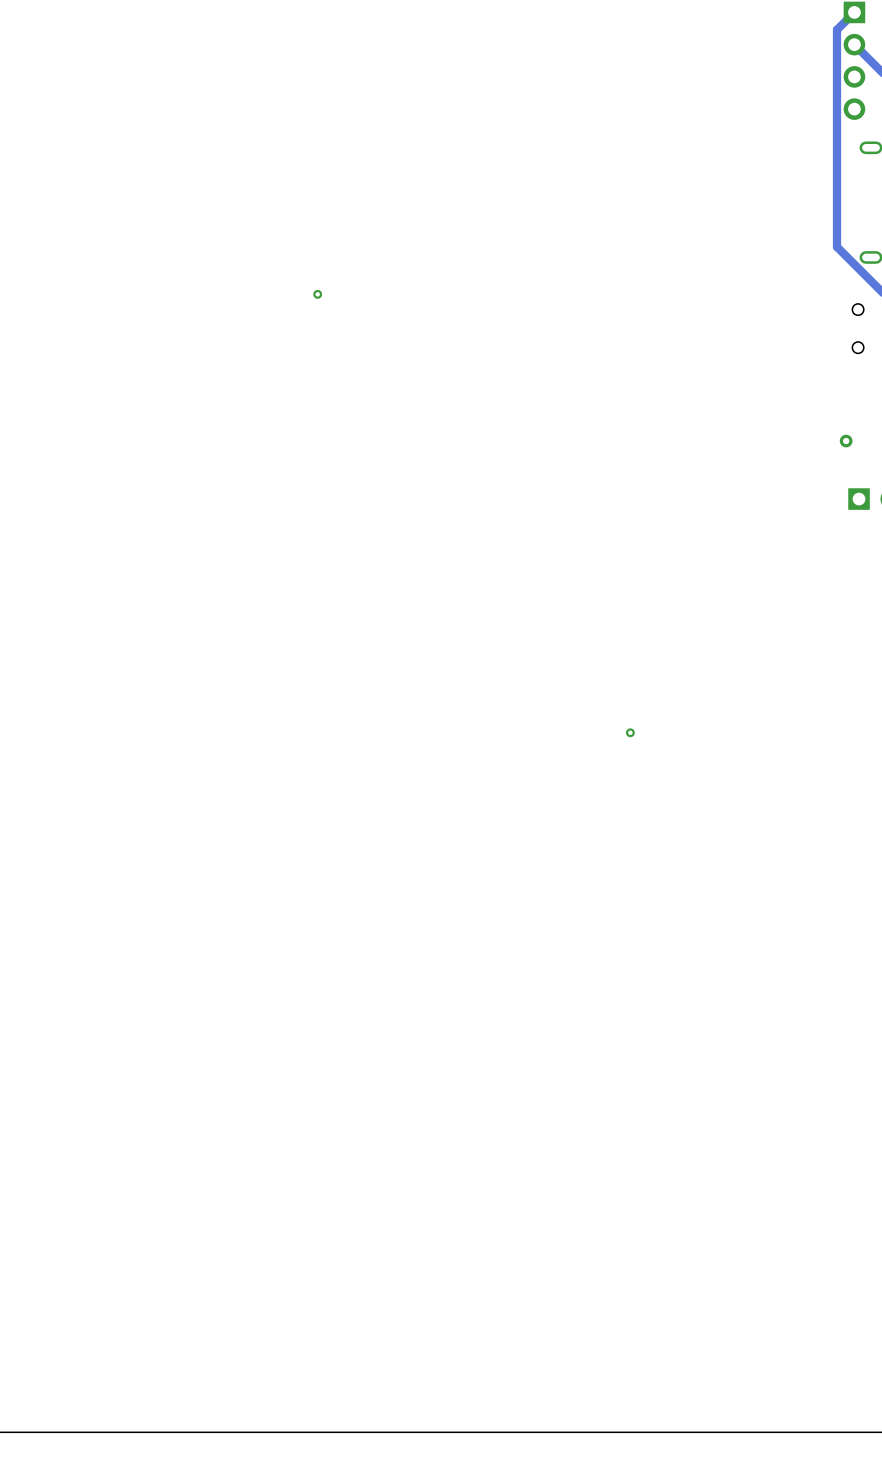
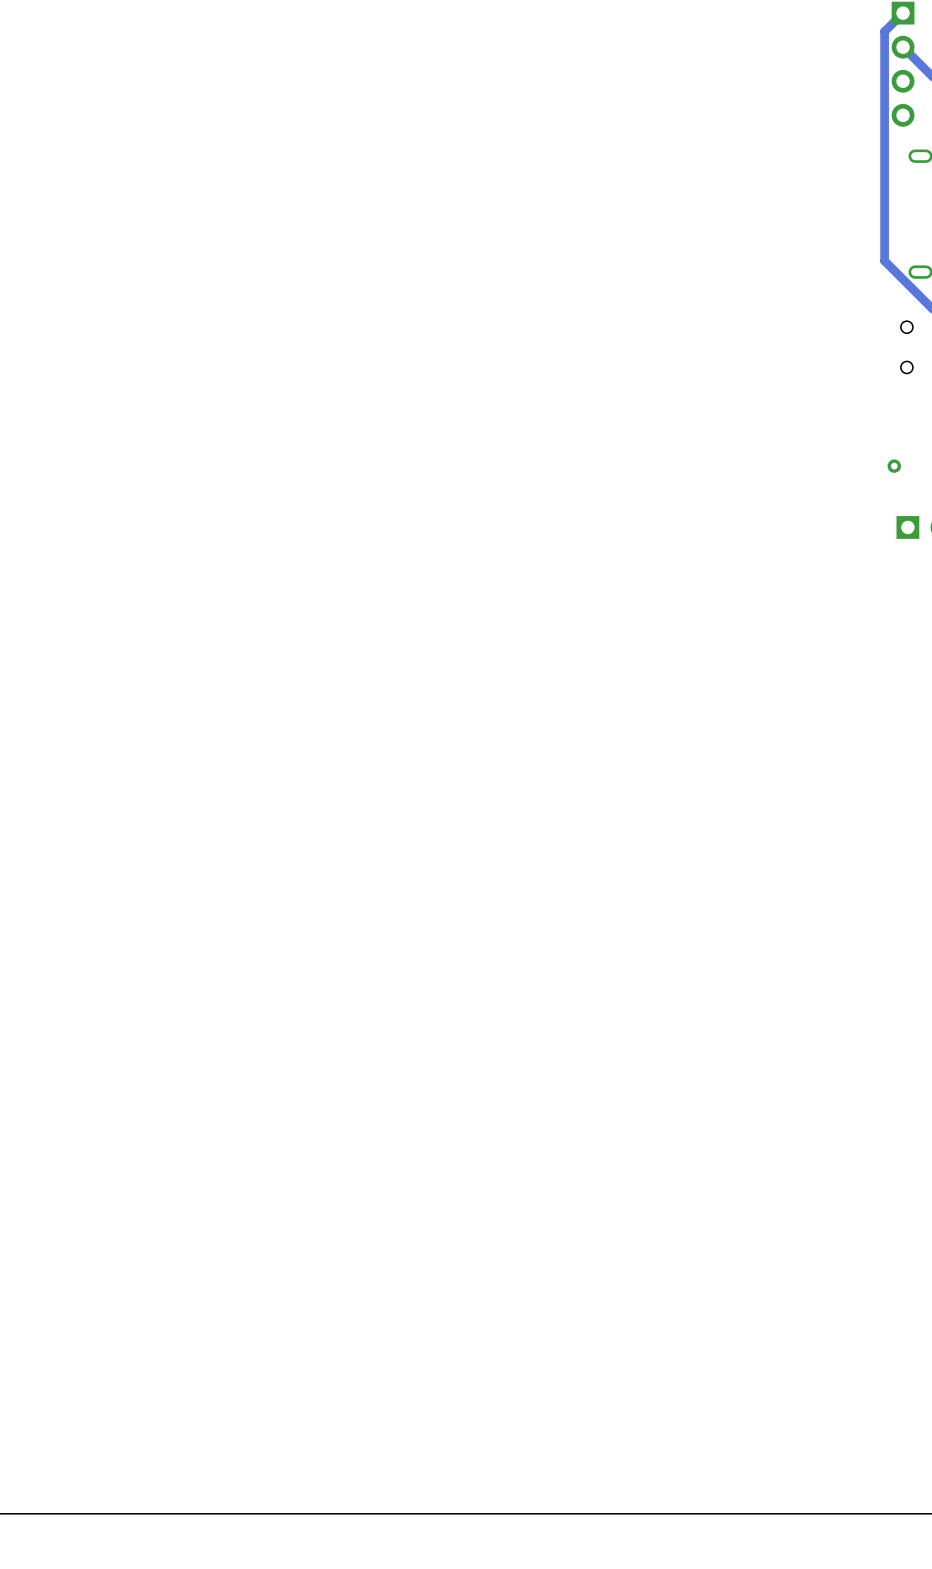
via: (317, 294) -> none
via: (630, 732) -> none

